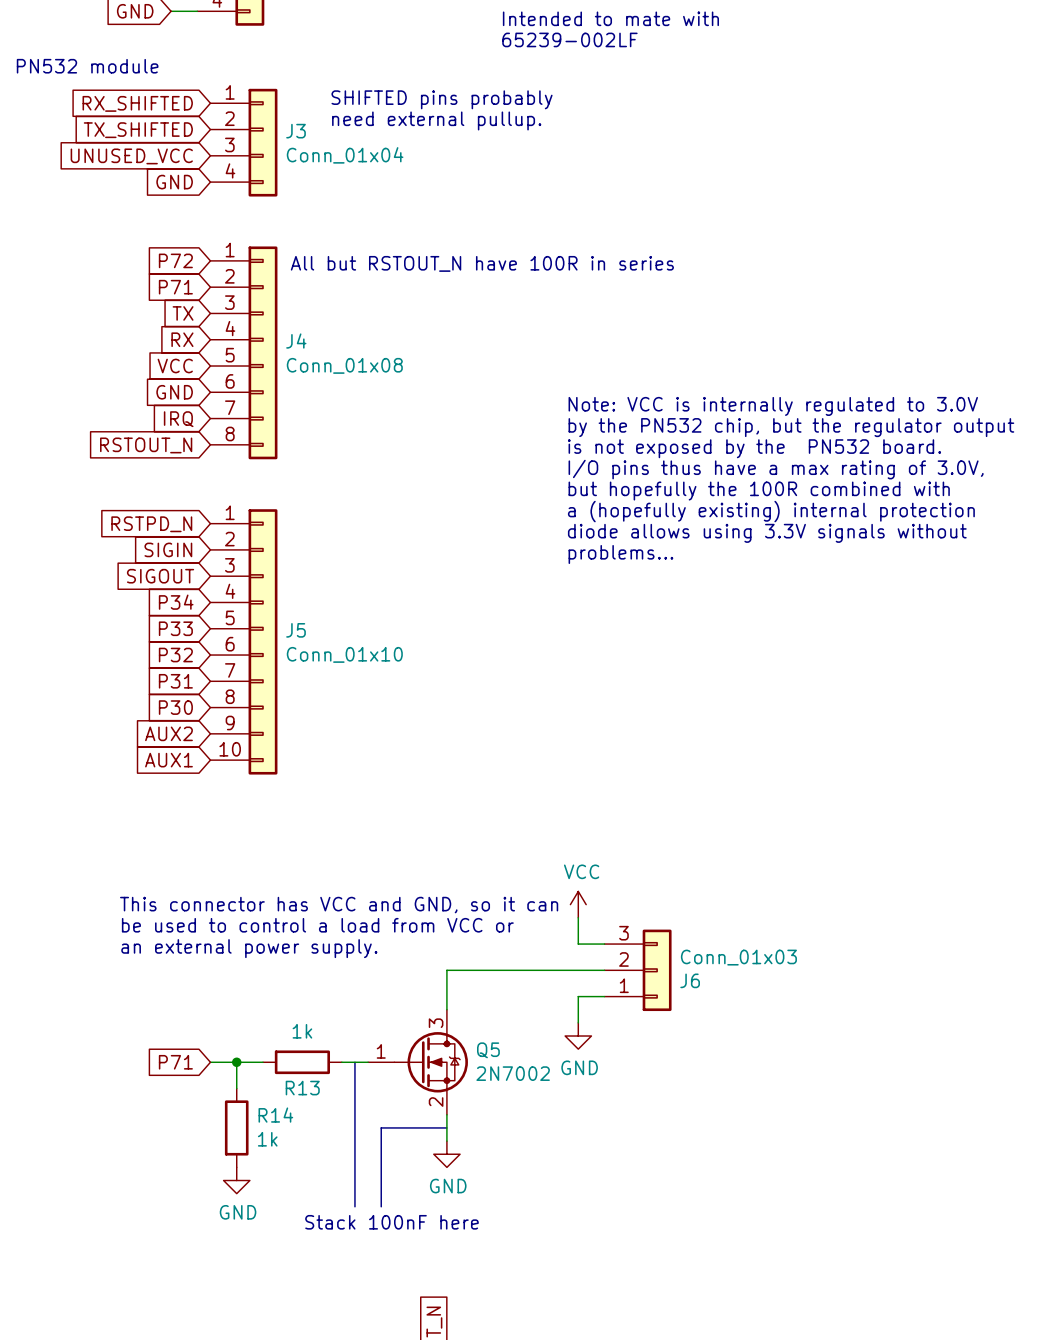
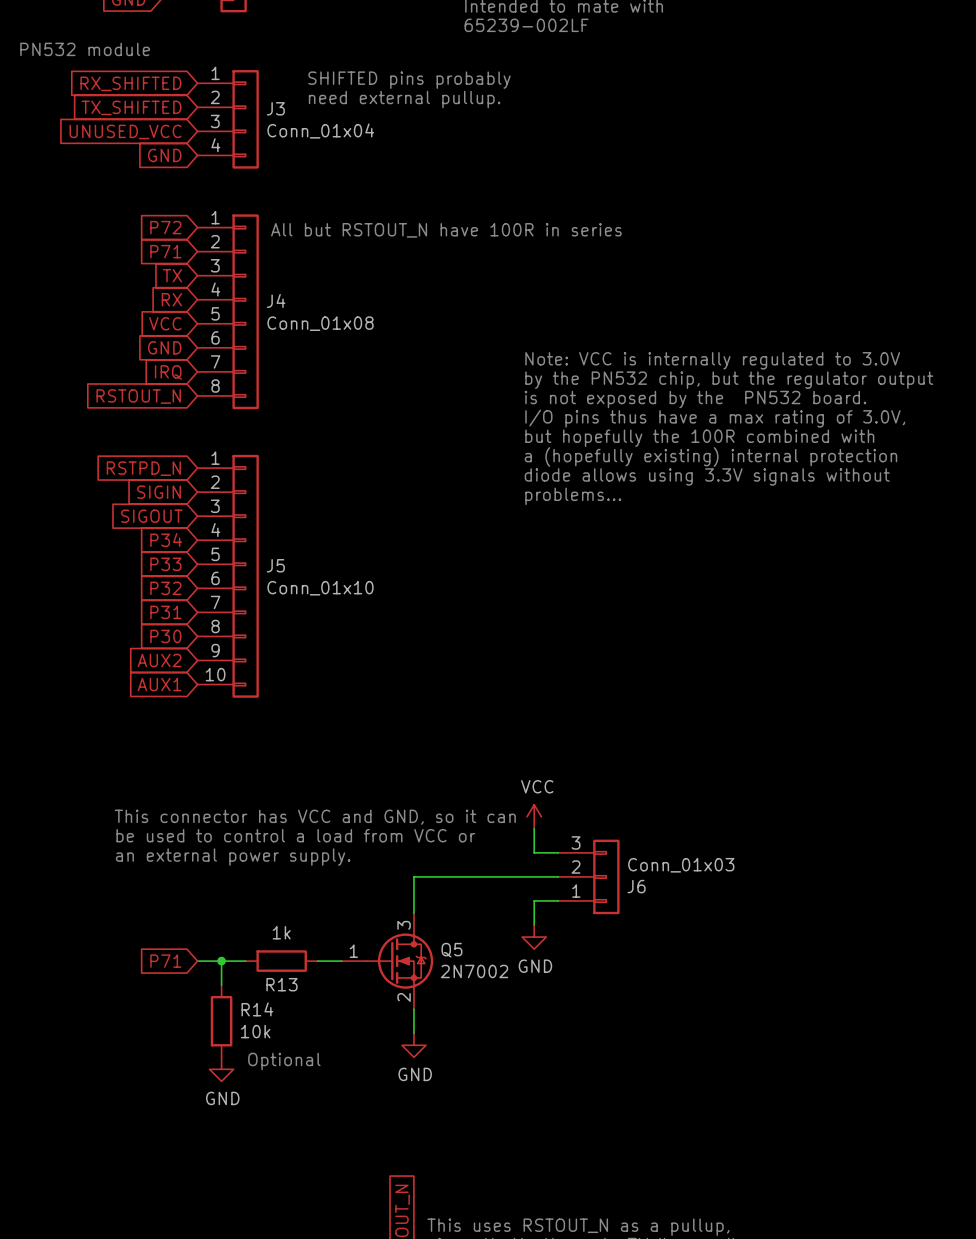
line: (354, 1062) (354, 1206) -> none
line: (446, 1127) (381, 1127) (381, 1206) -> none
R14 value: 1k (267, 1139) -> 10k (255, 1031)
text: none -> Optional (284, 1061)
text: Stack 100nF here (391, 1222) -> none

